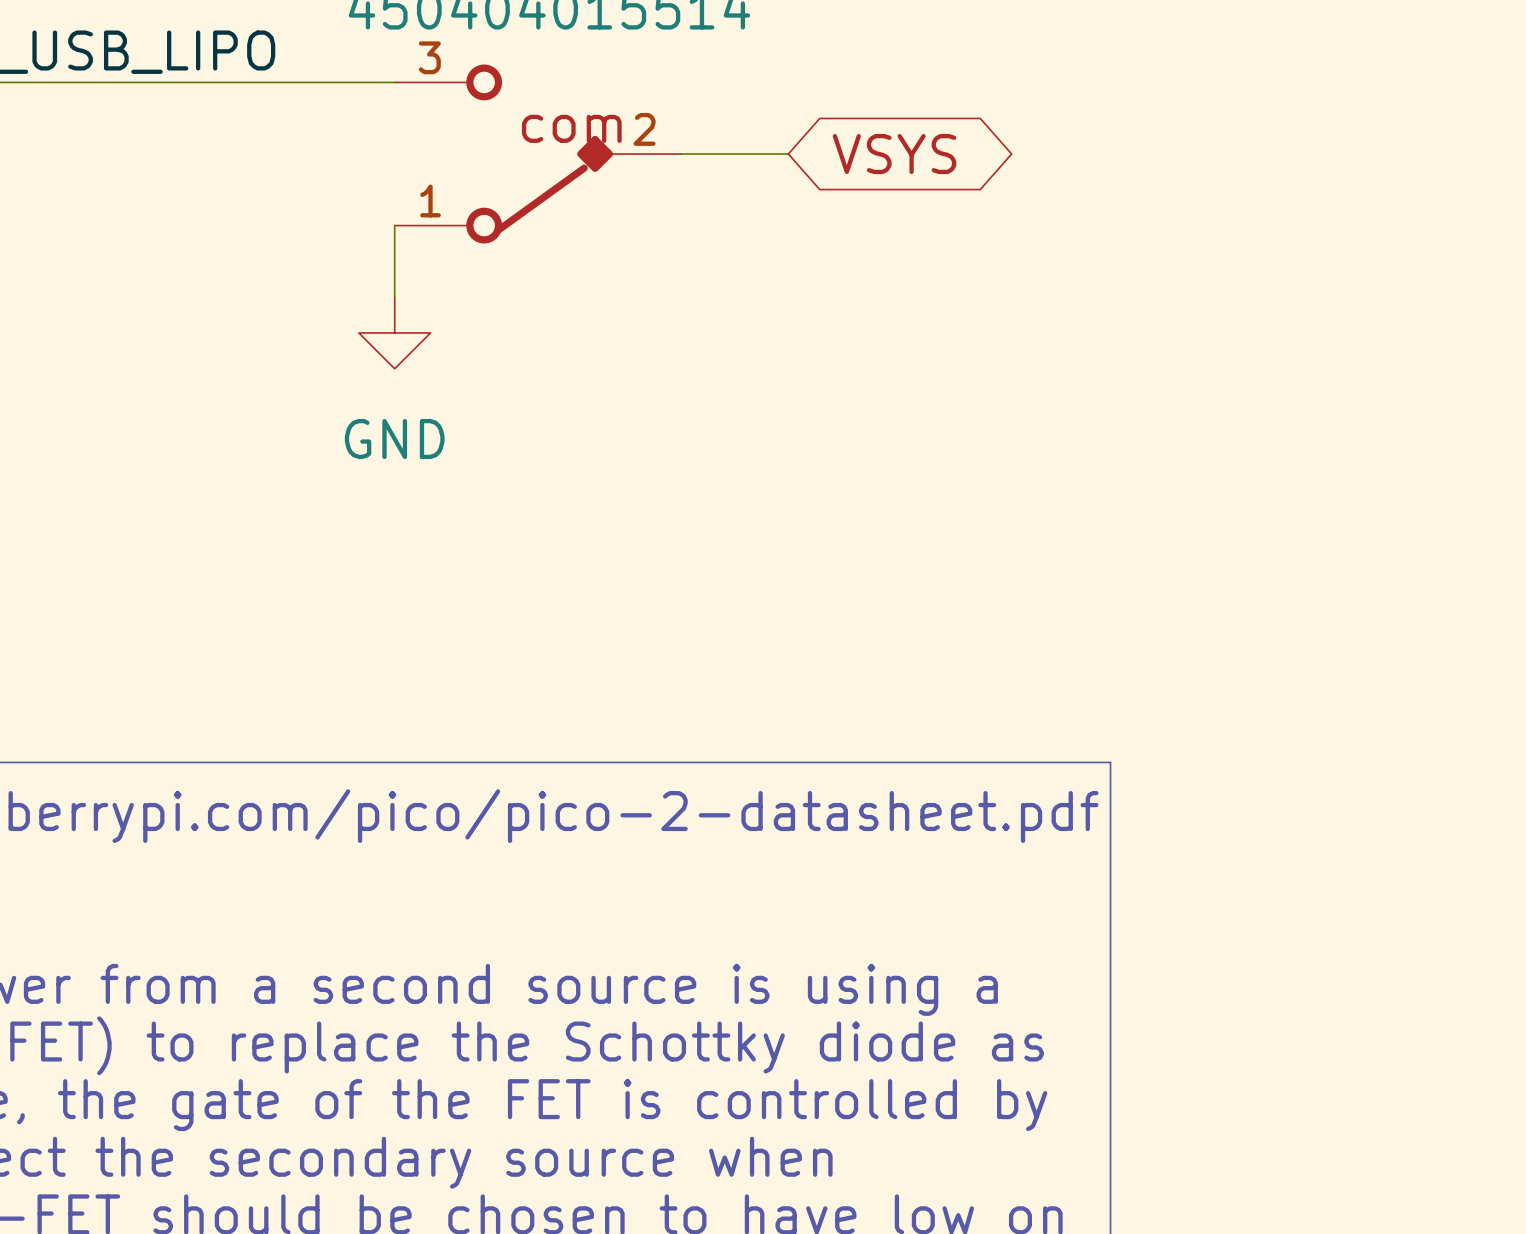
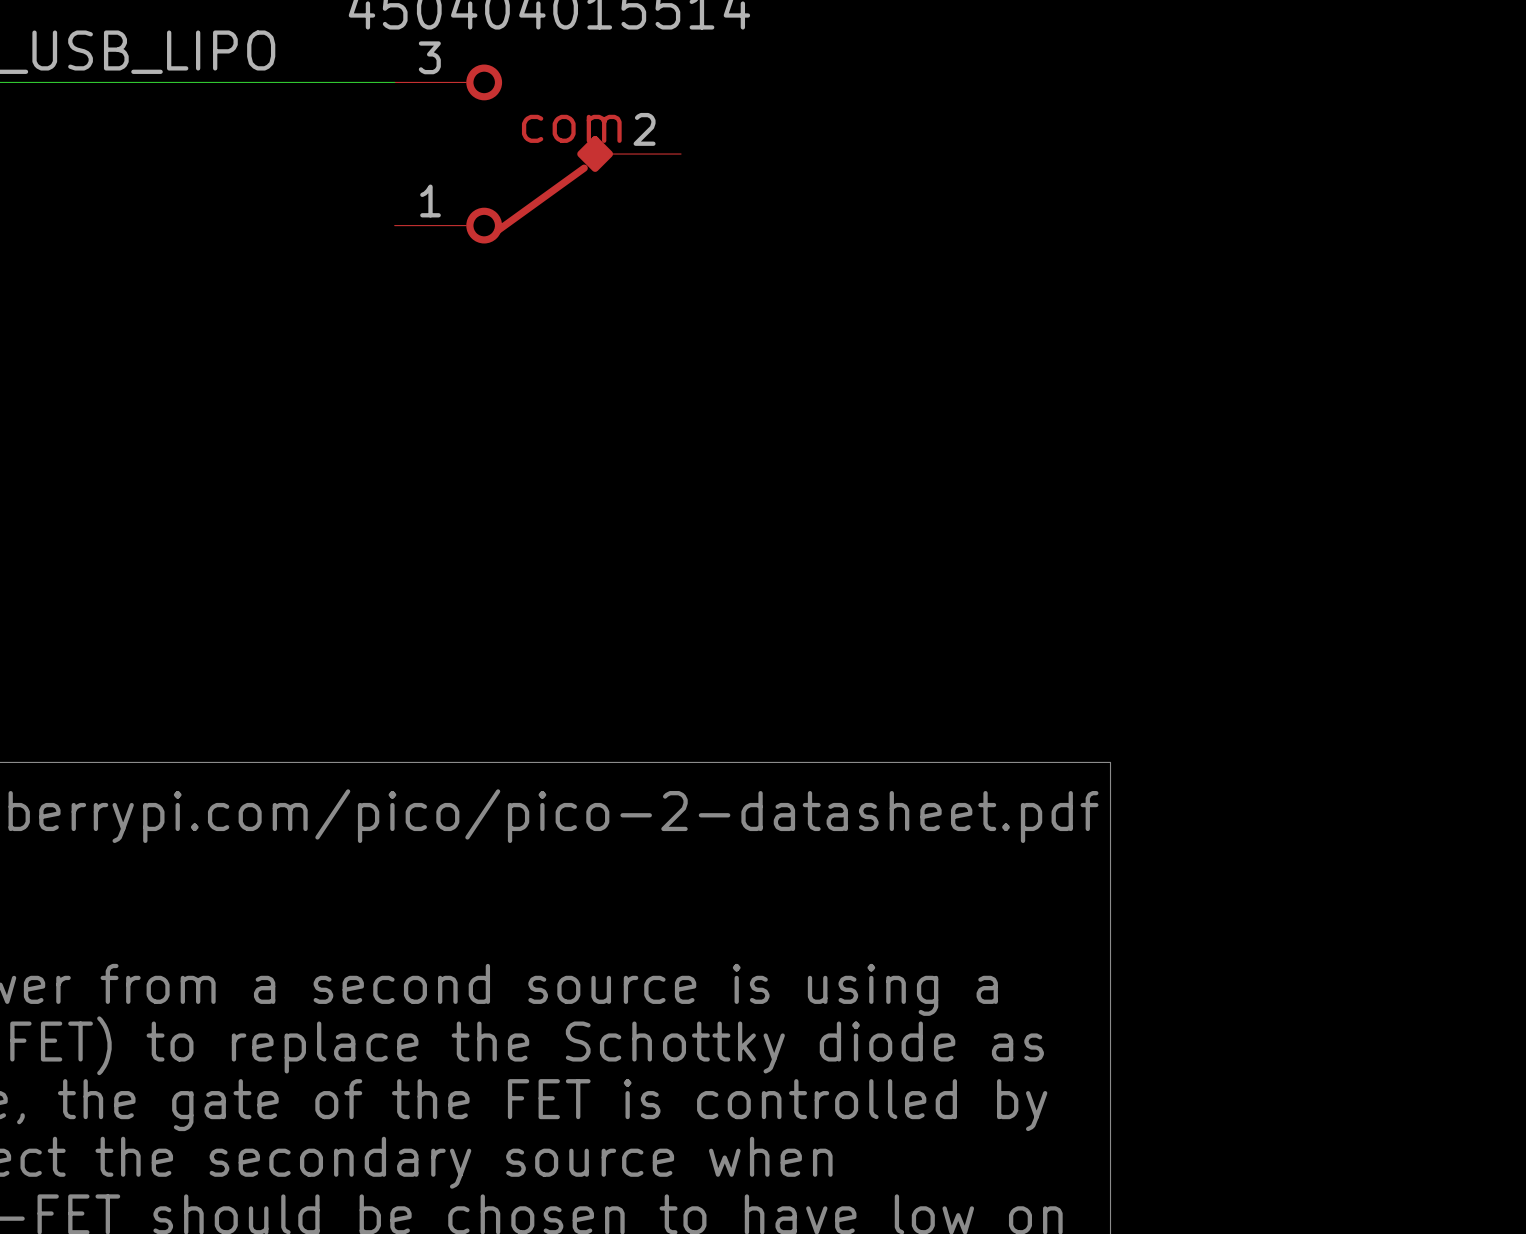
wire: (681, 154) (788, 154) -> none
global label: VSYS (894, 154) -> none
wire: (394, 225) (394, 297) -> none
power symbol: GND (394, 332) -> none

